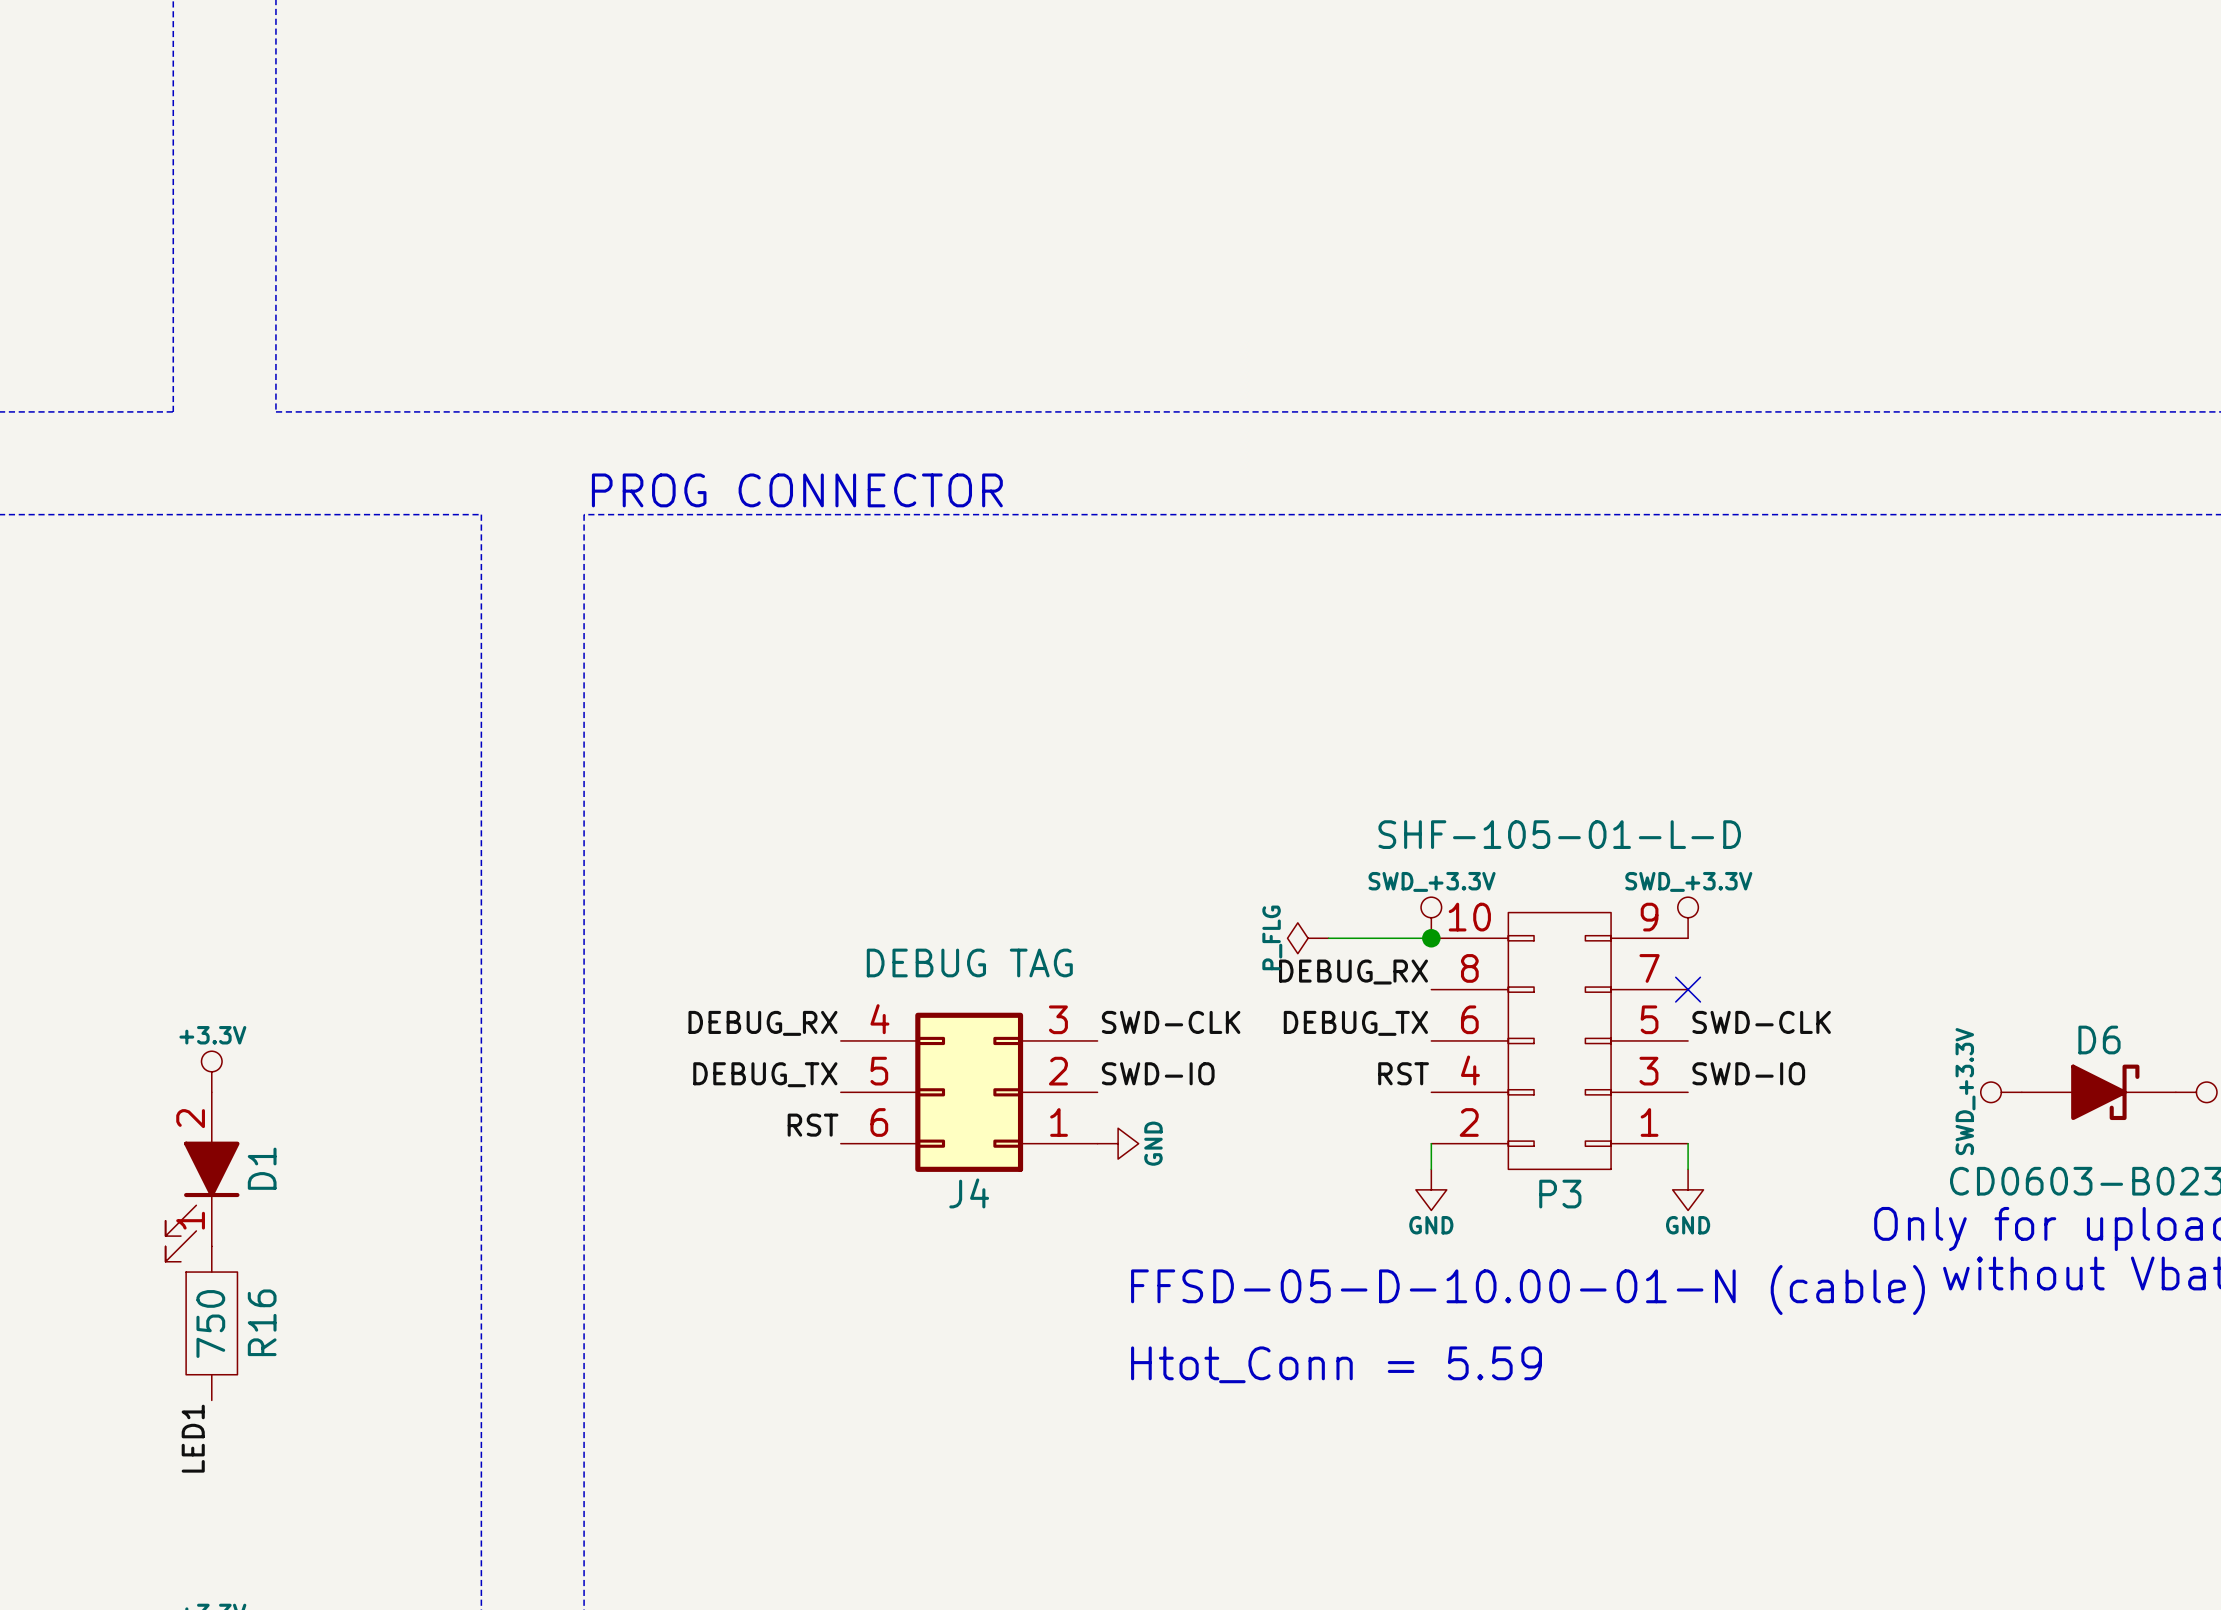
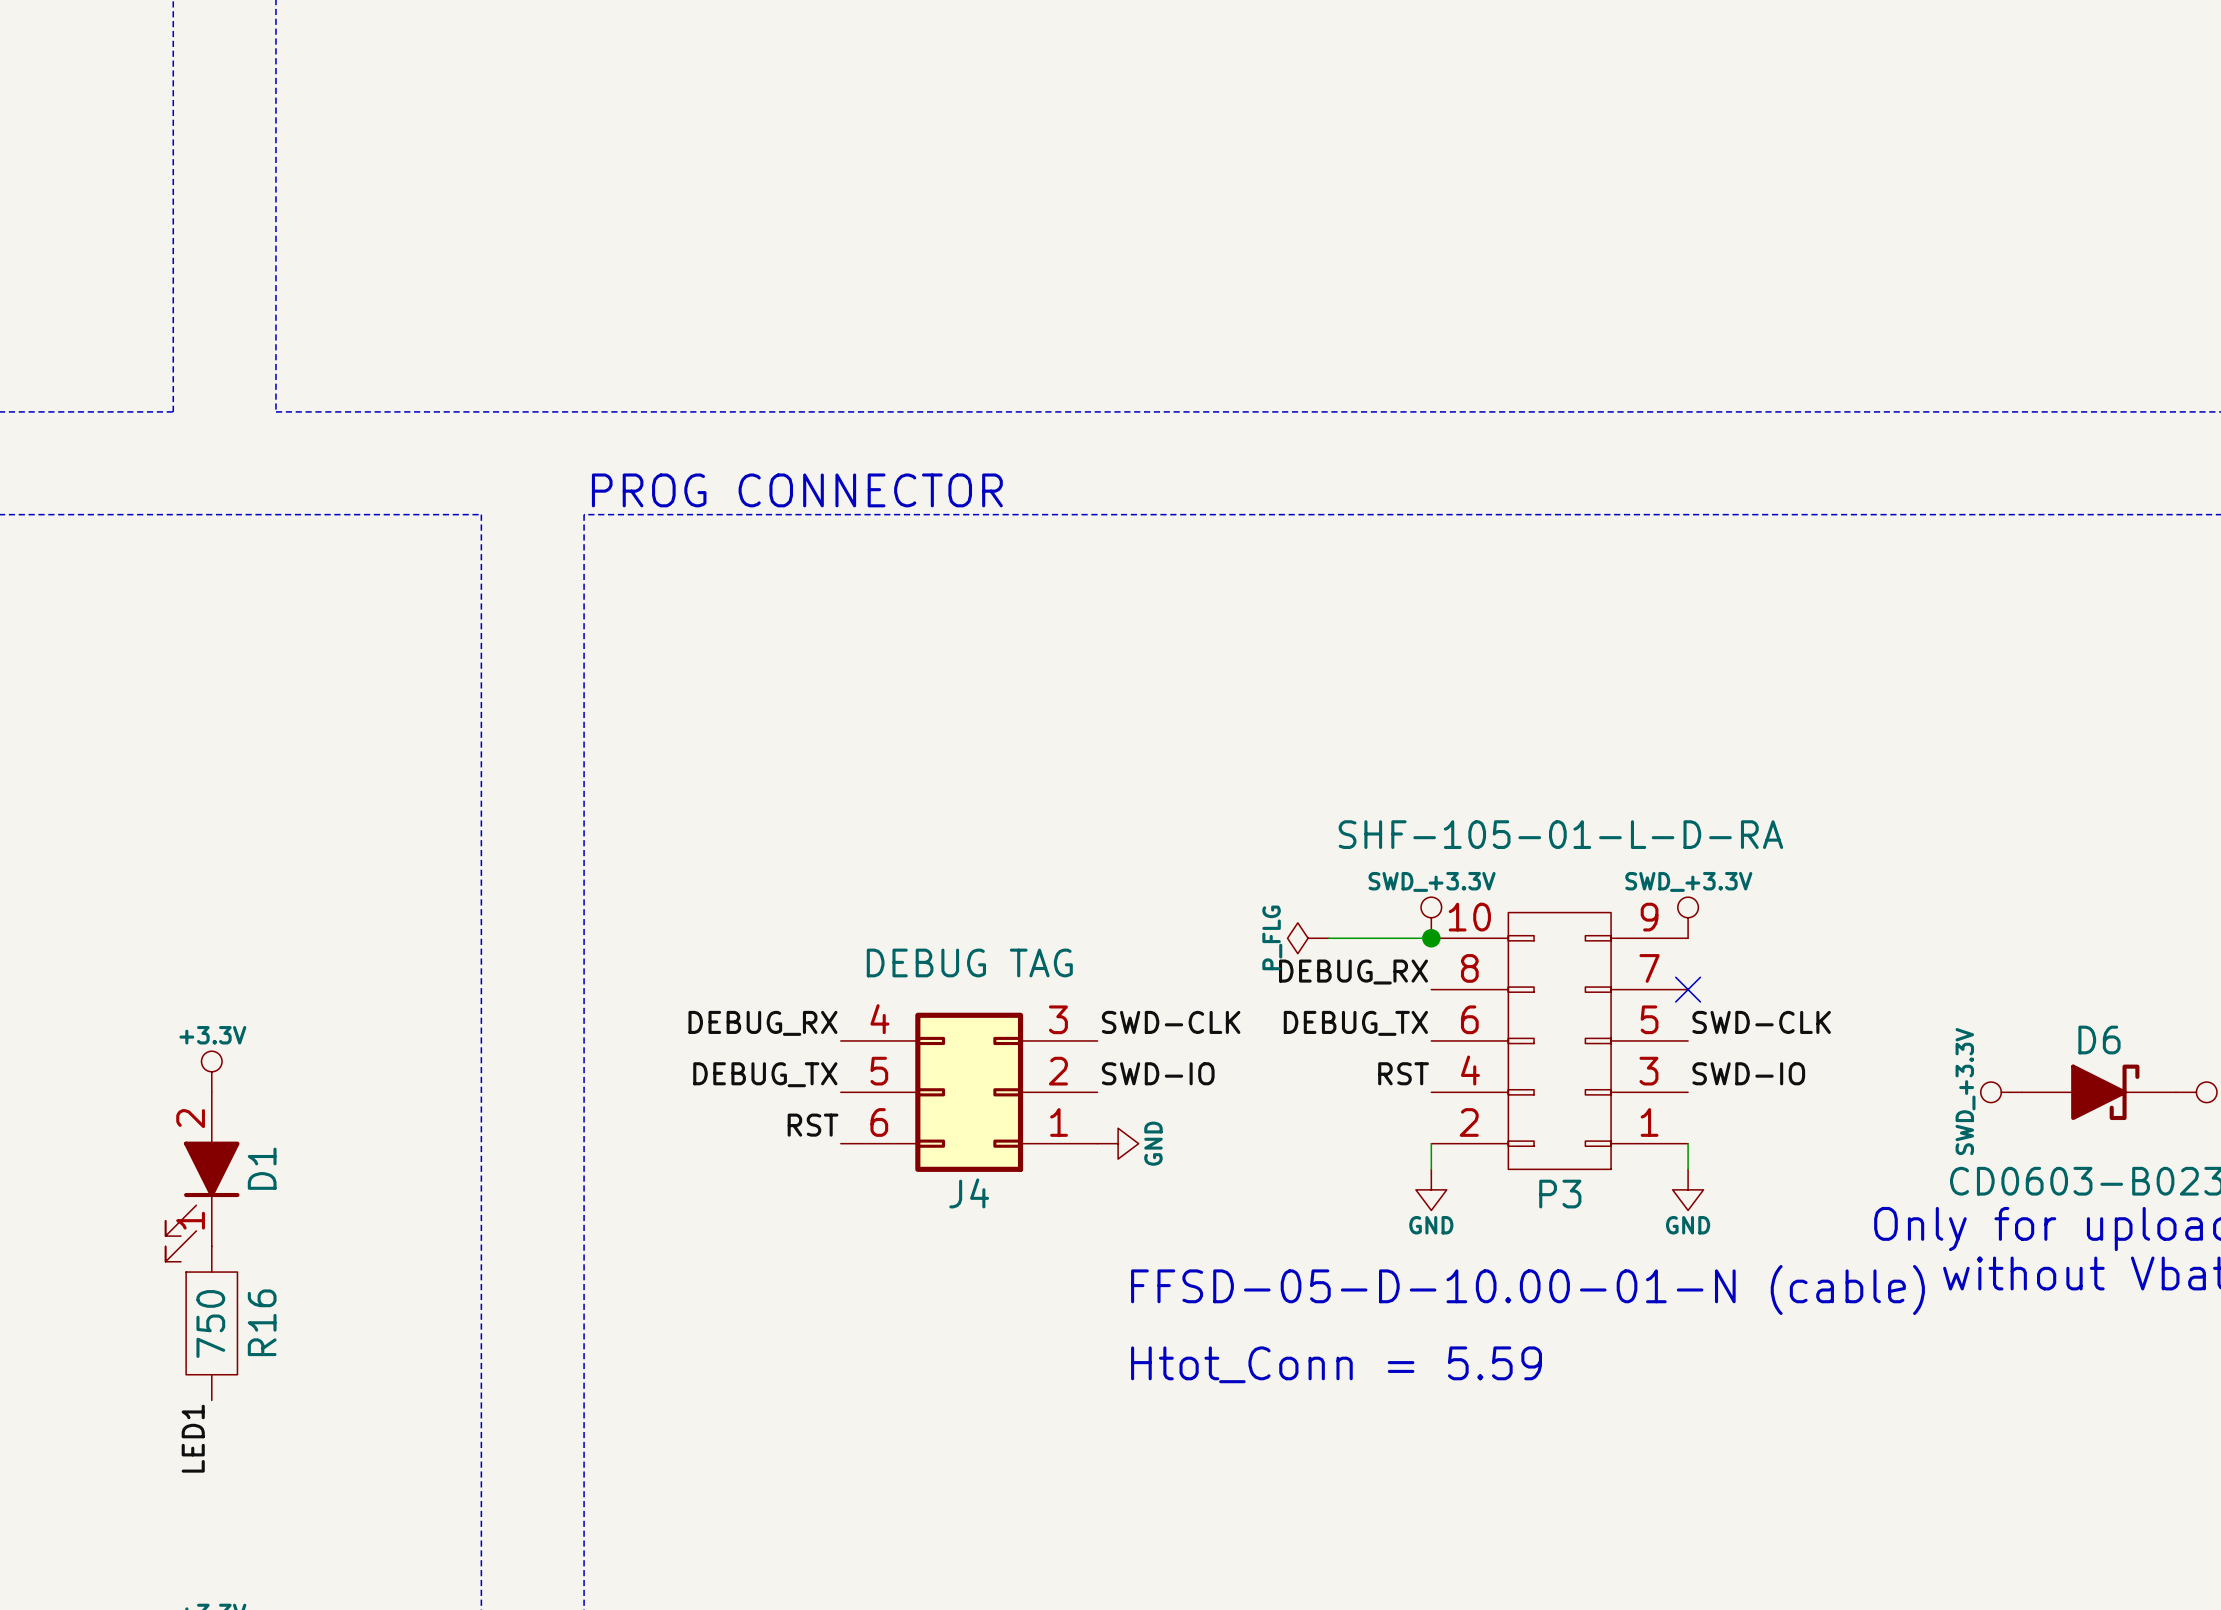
P3 text: SHF-105-01-L-D (1559, 834) -> SHF-105-01-L-D-RA (1560, 834)

